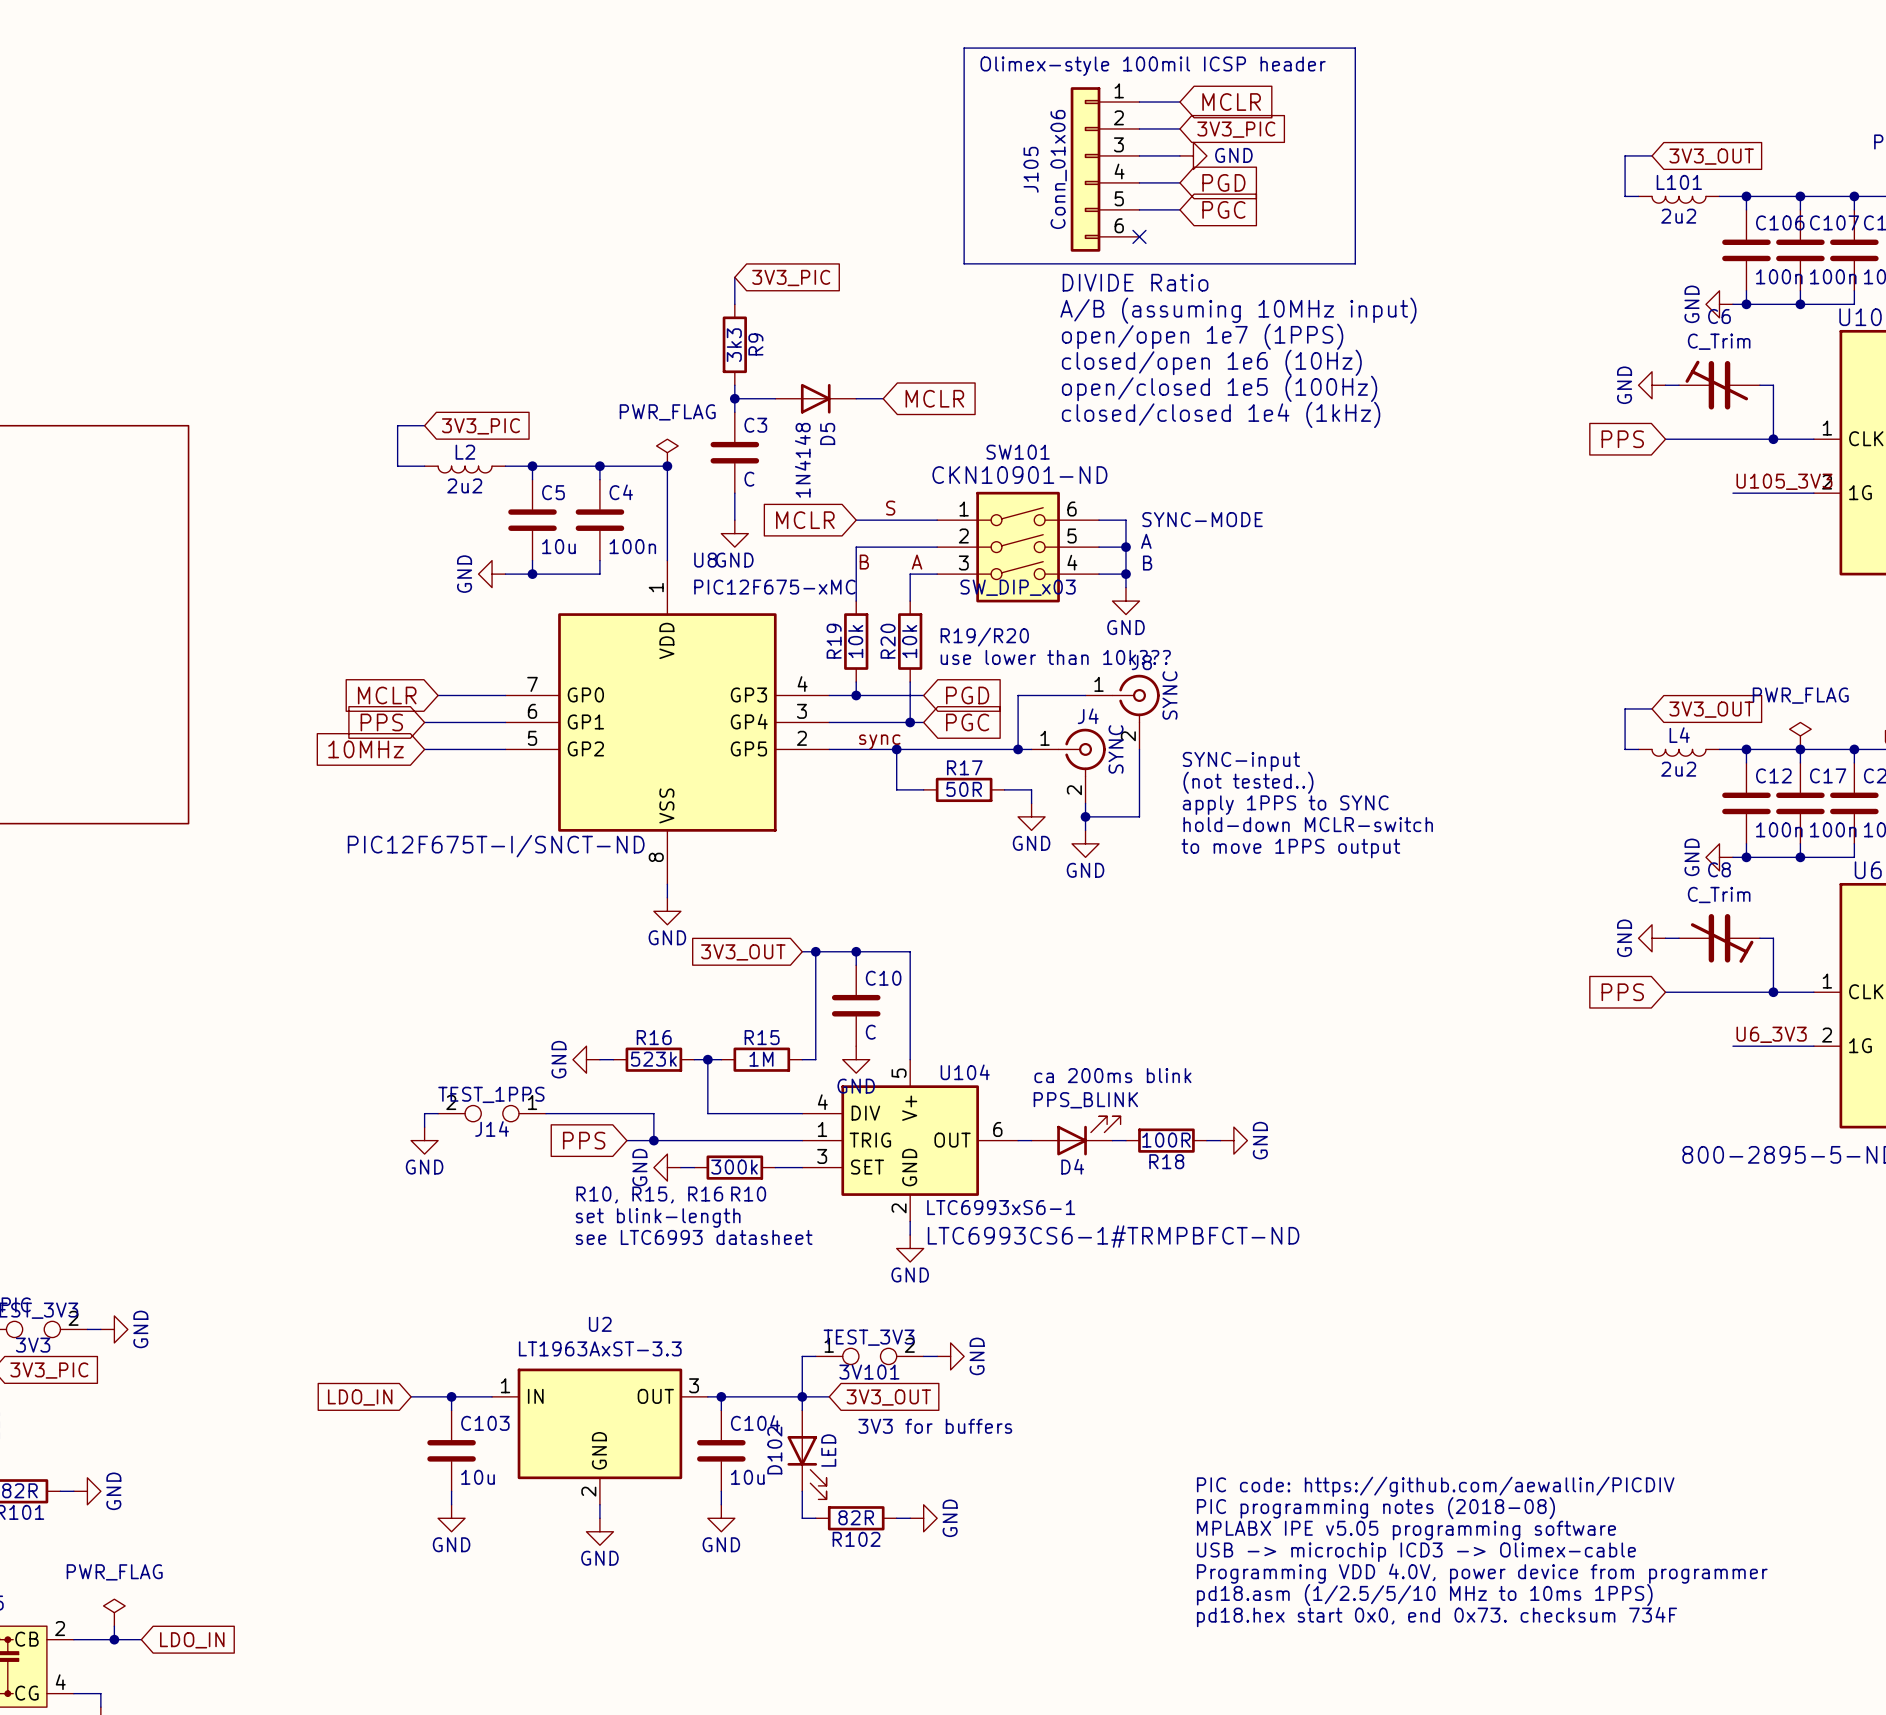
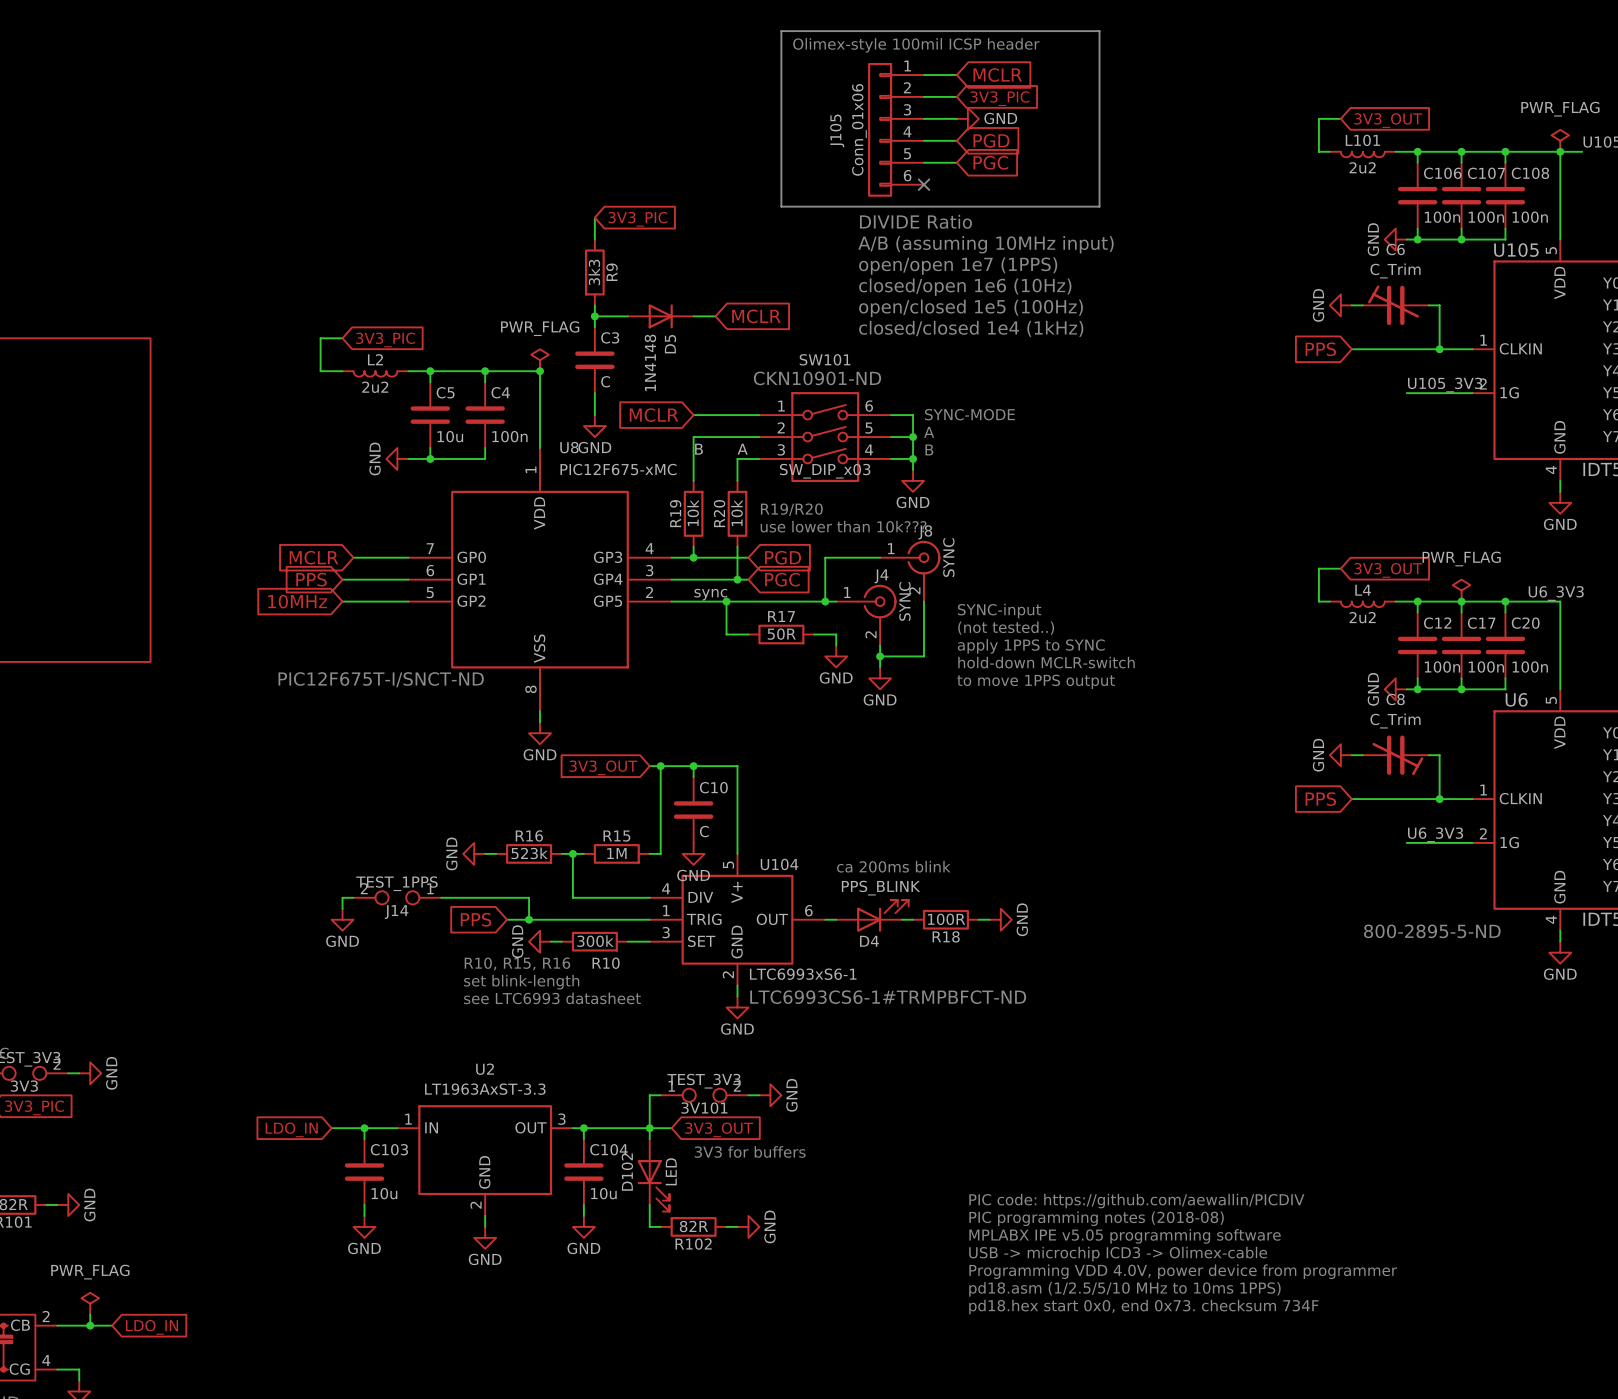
label: S (890, 508) -> none

